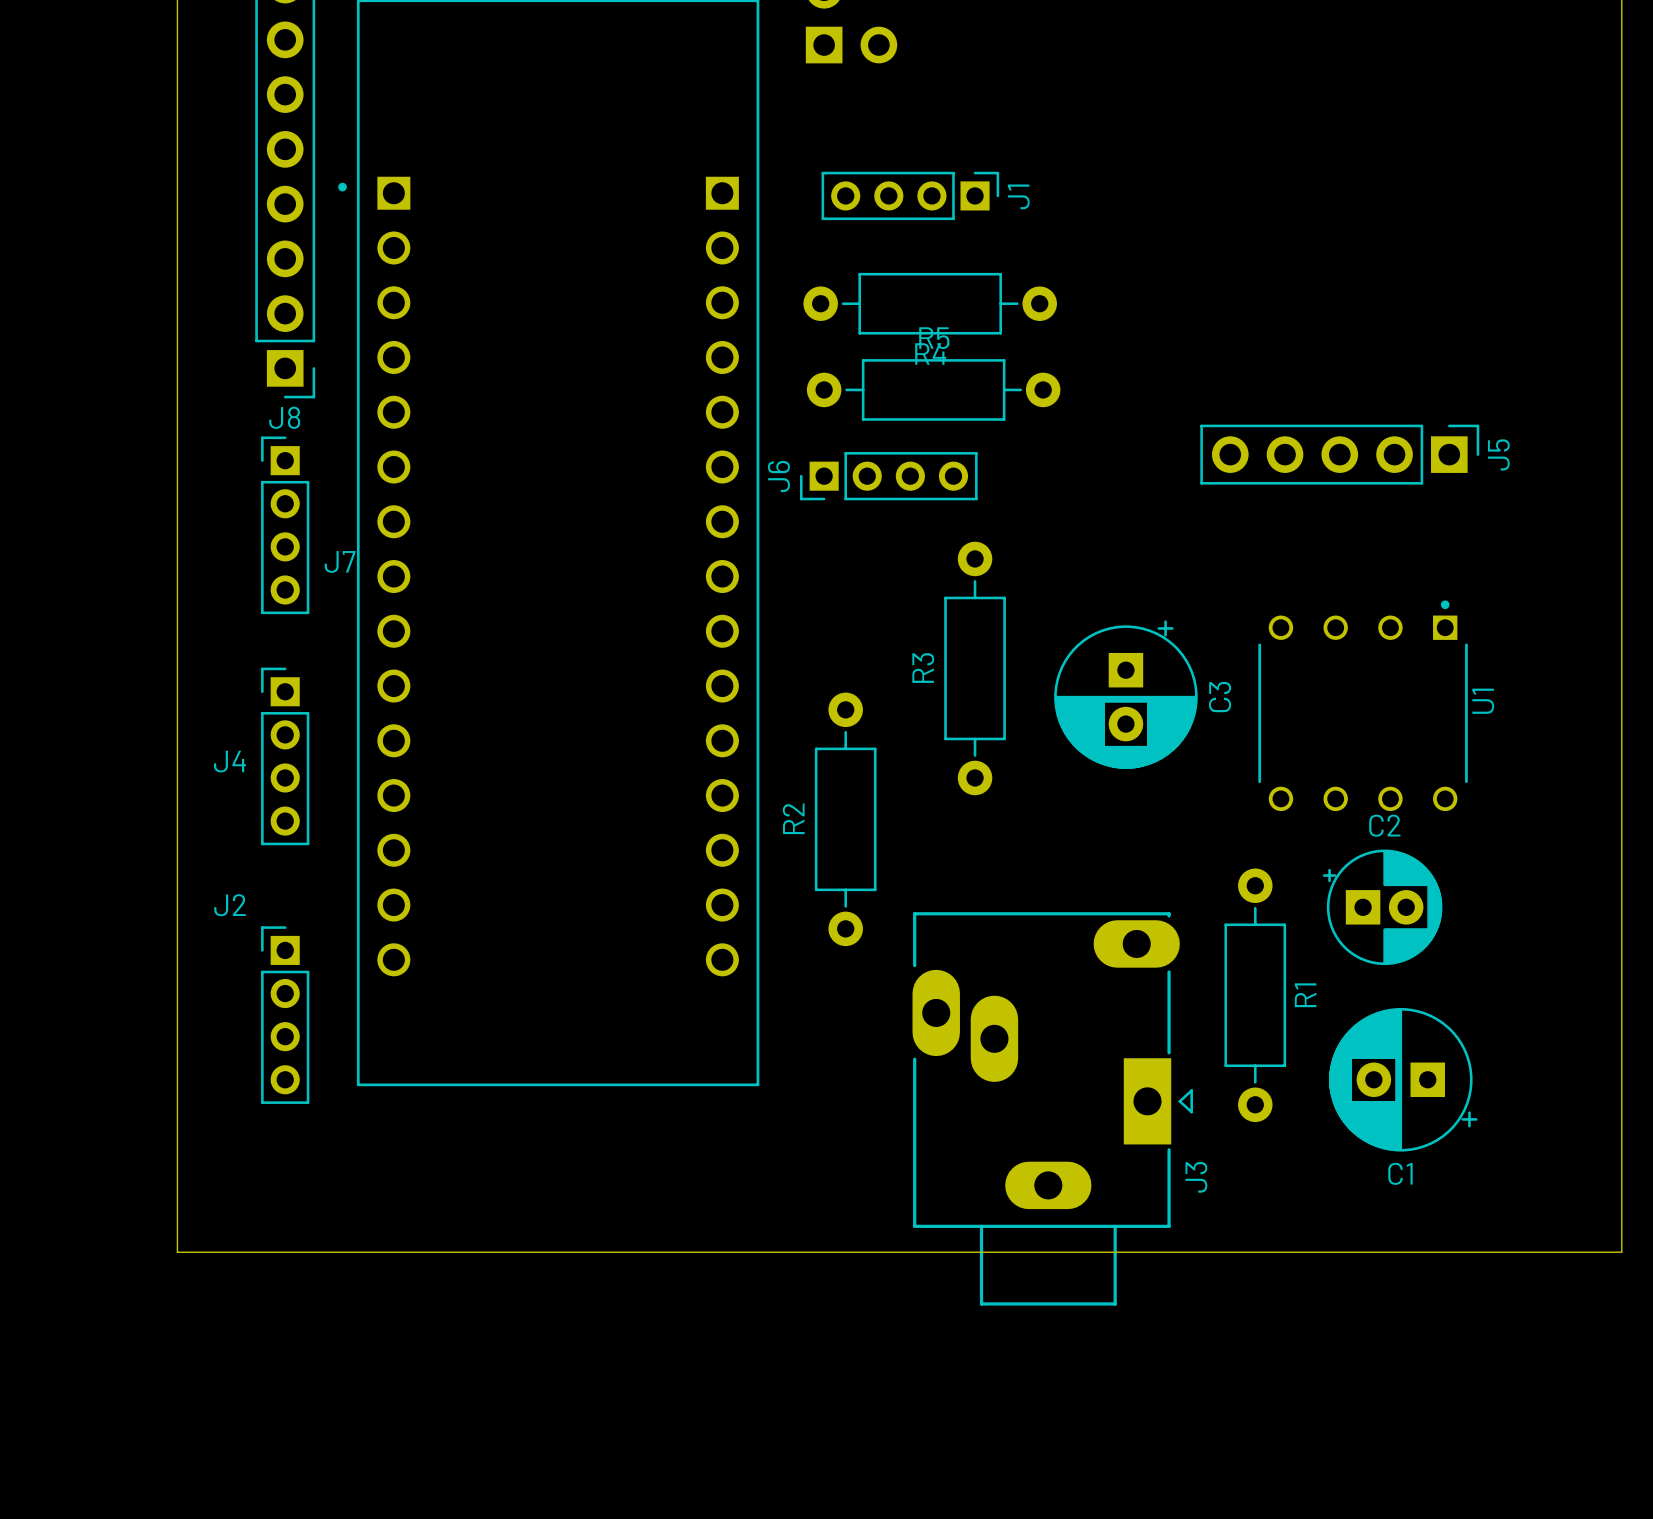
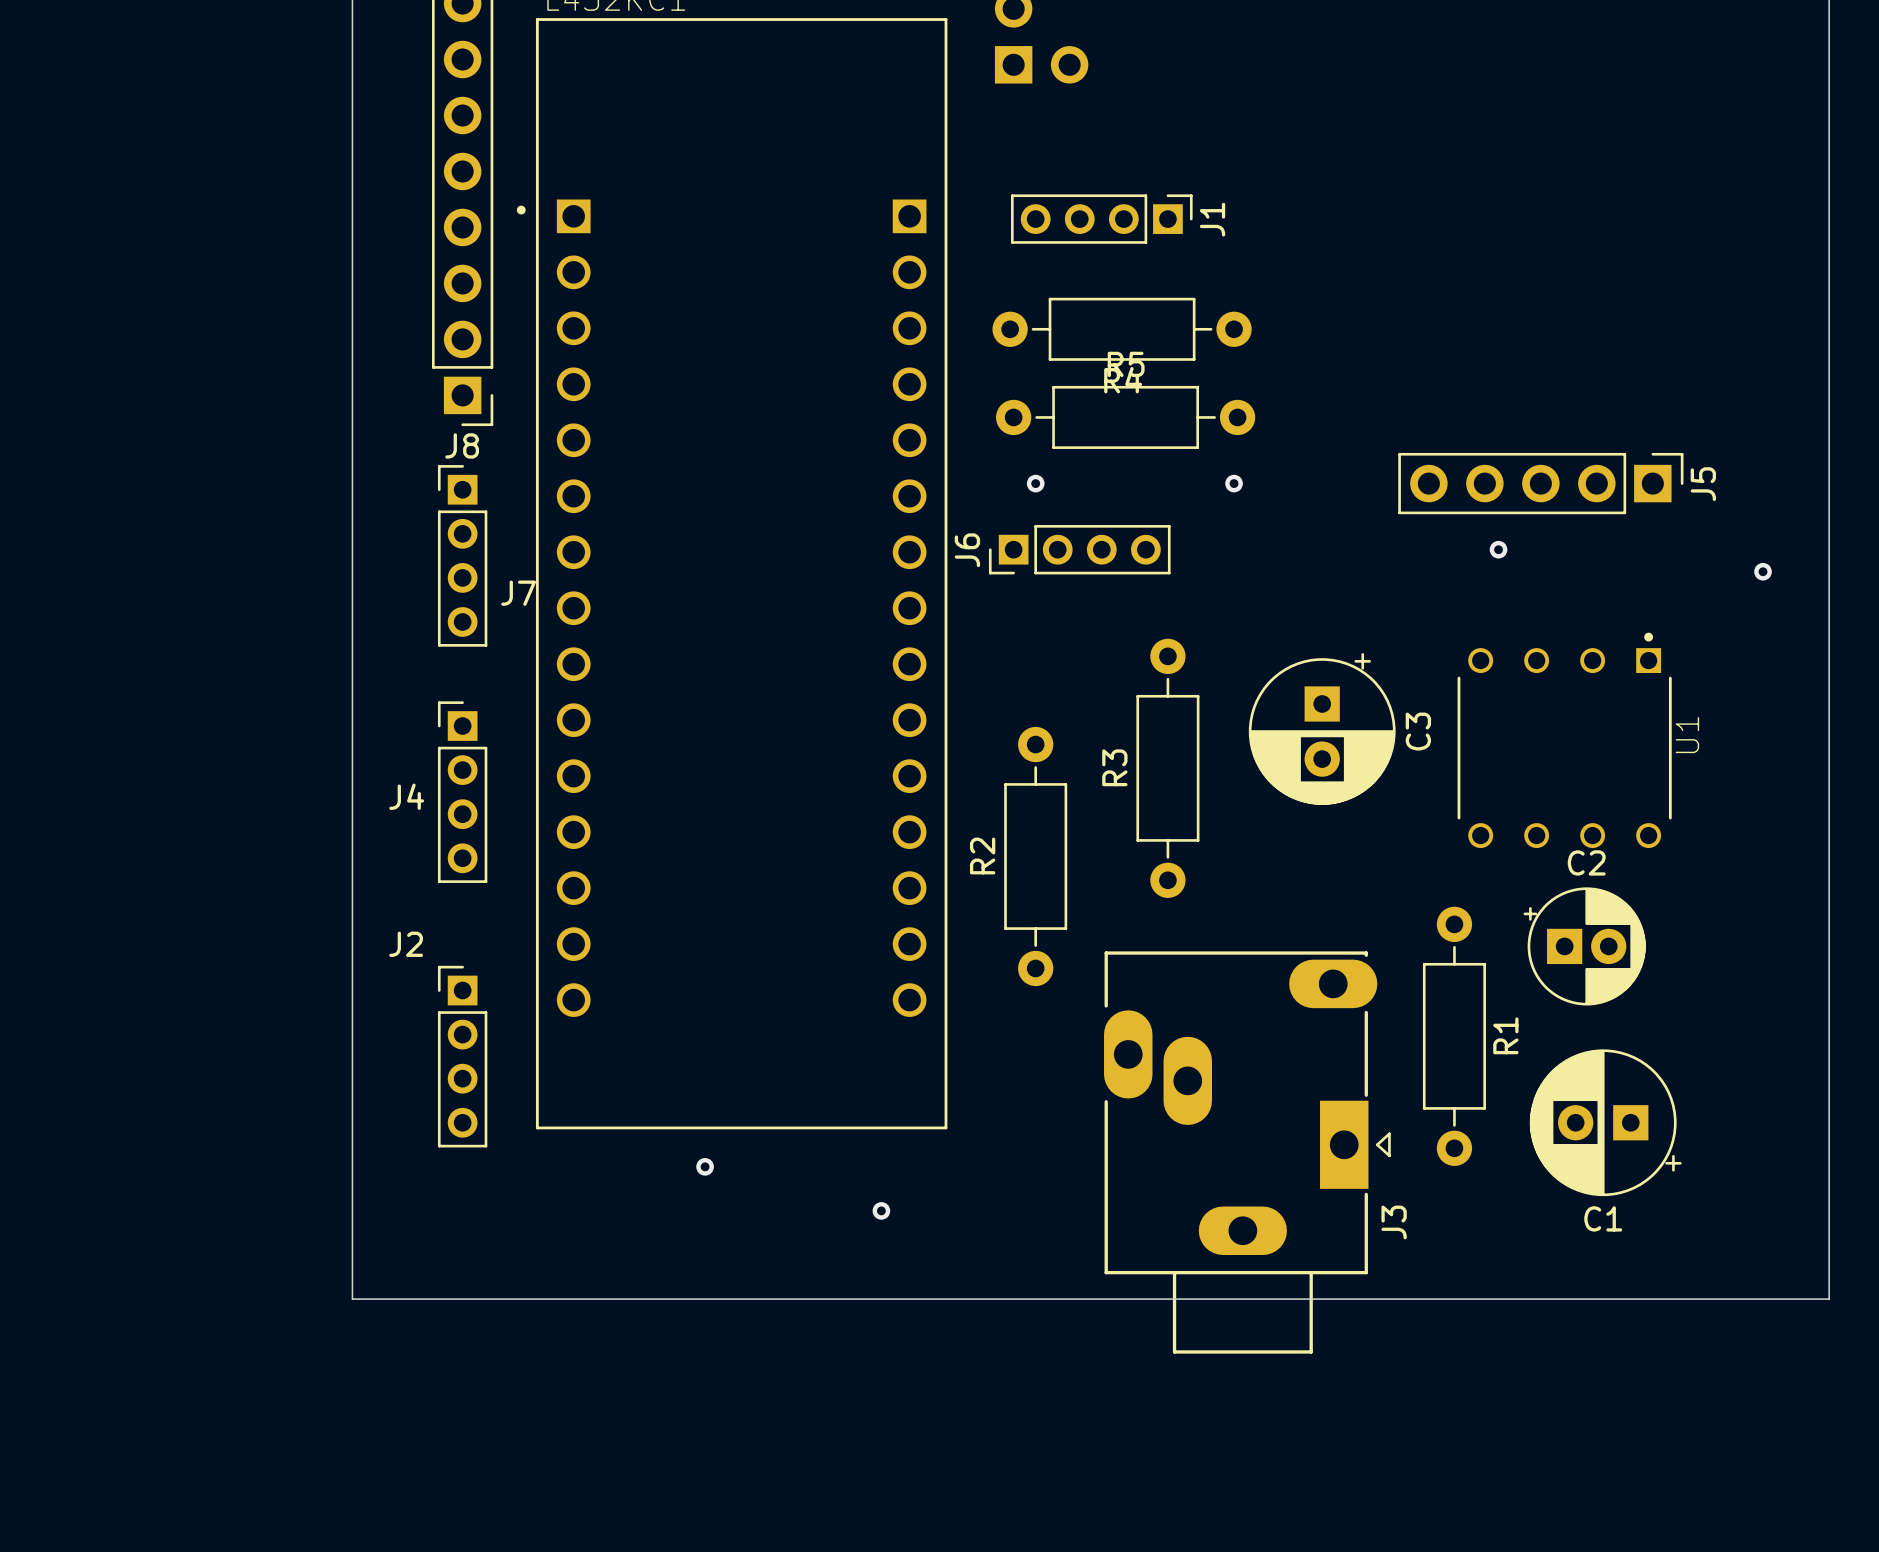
via: none -> (1035, 483)
via: none -> (1234, 483)
J6 position: (888, 476) -> (1079, 549)
via: none -> (1498, 549)
via: none -> (1763, 571)
R3 position: (975, 668) -> (1167, 768)
via: none -> (705, 1166)
via: none -> (881, 1210)

